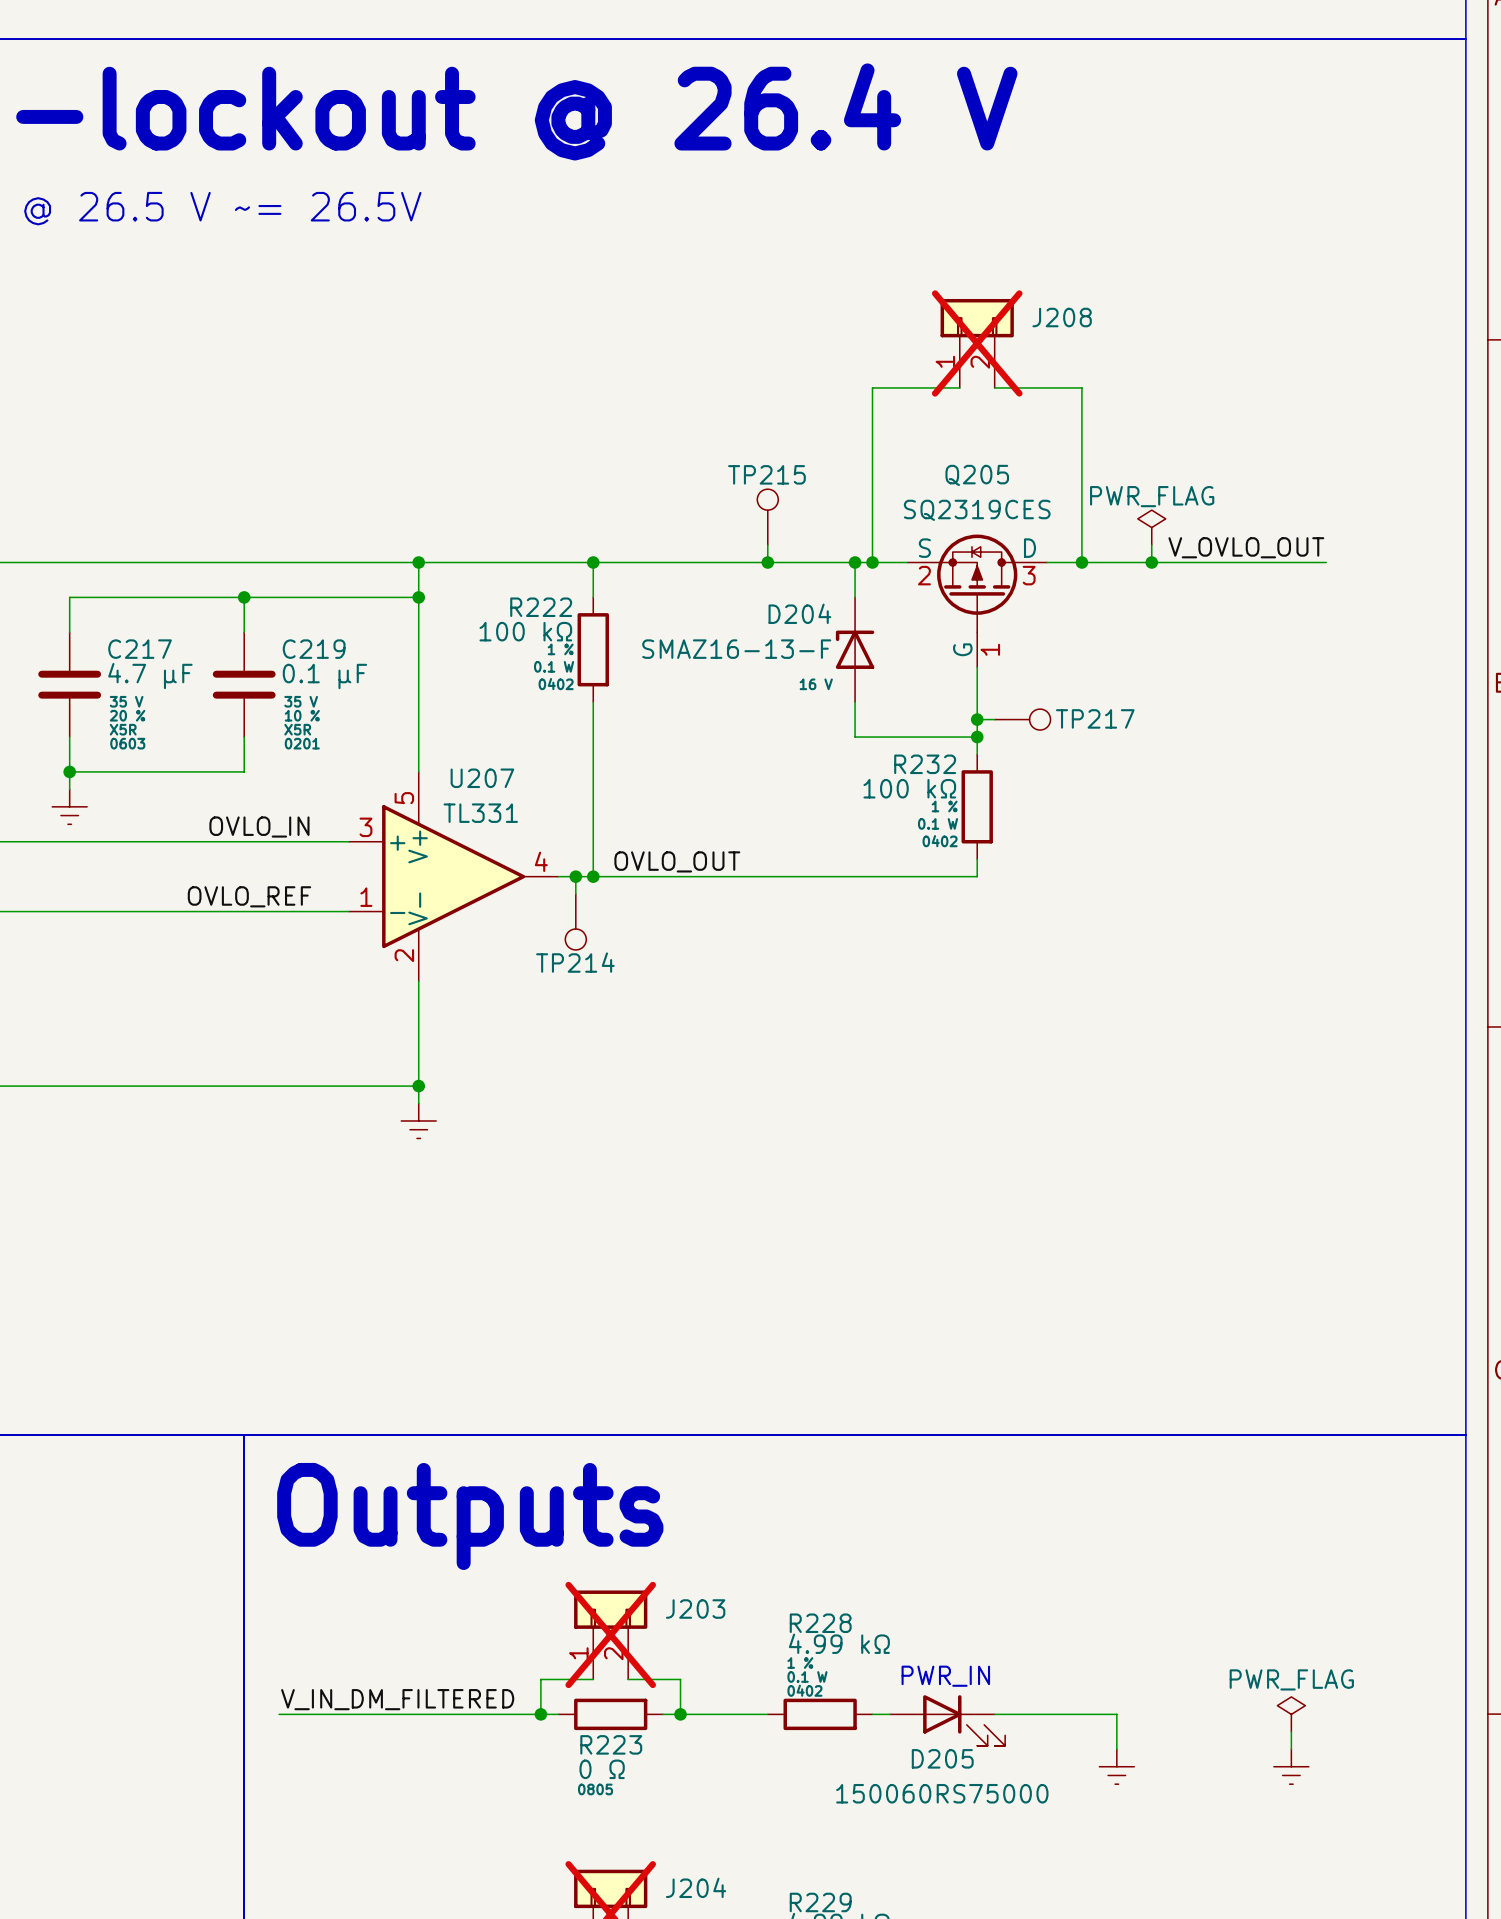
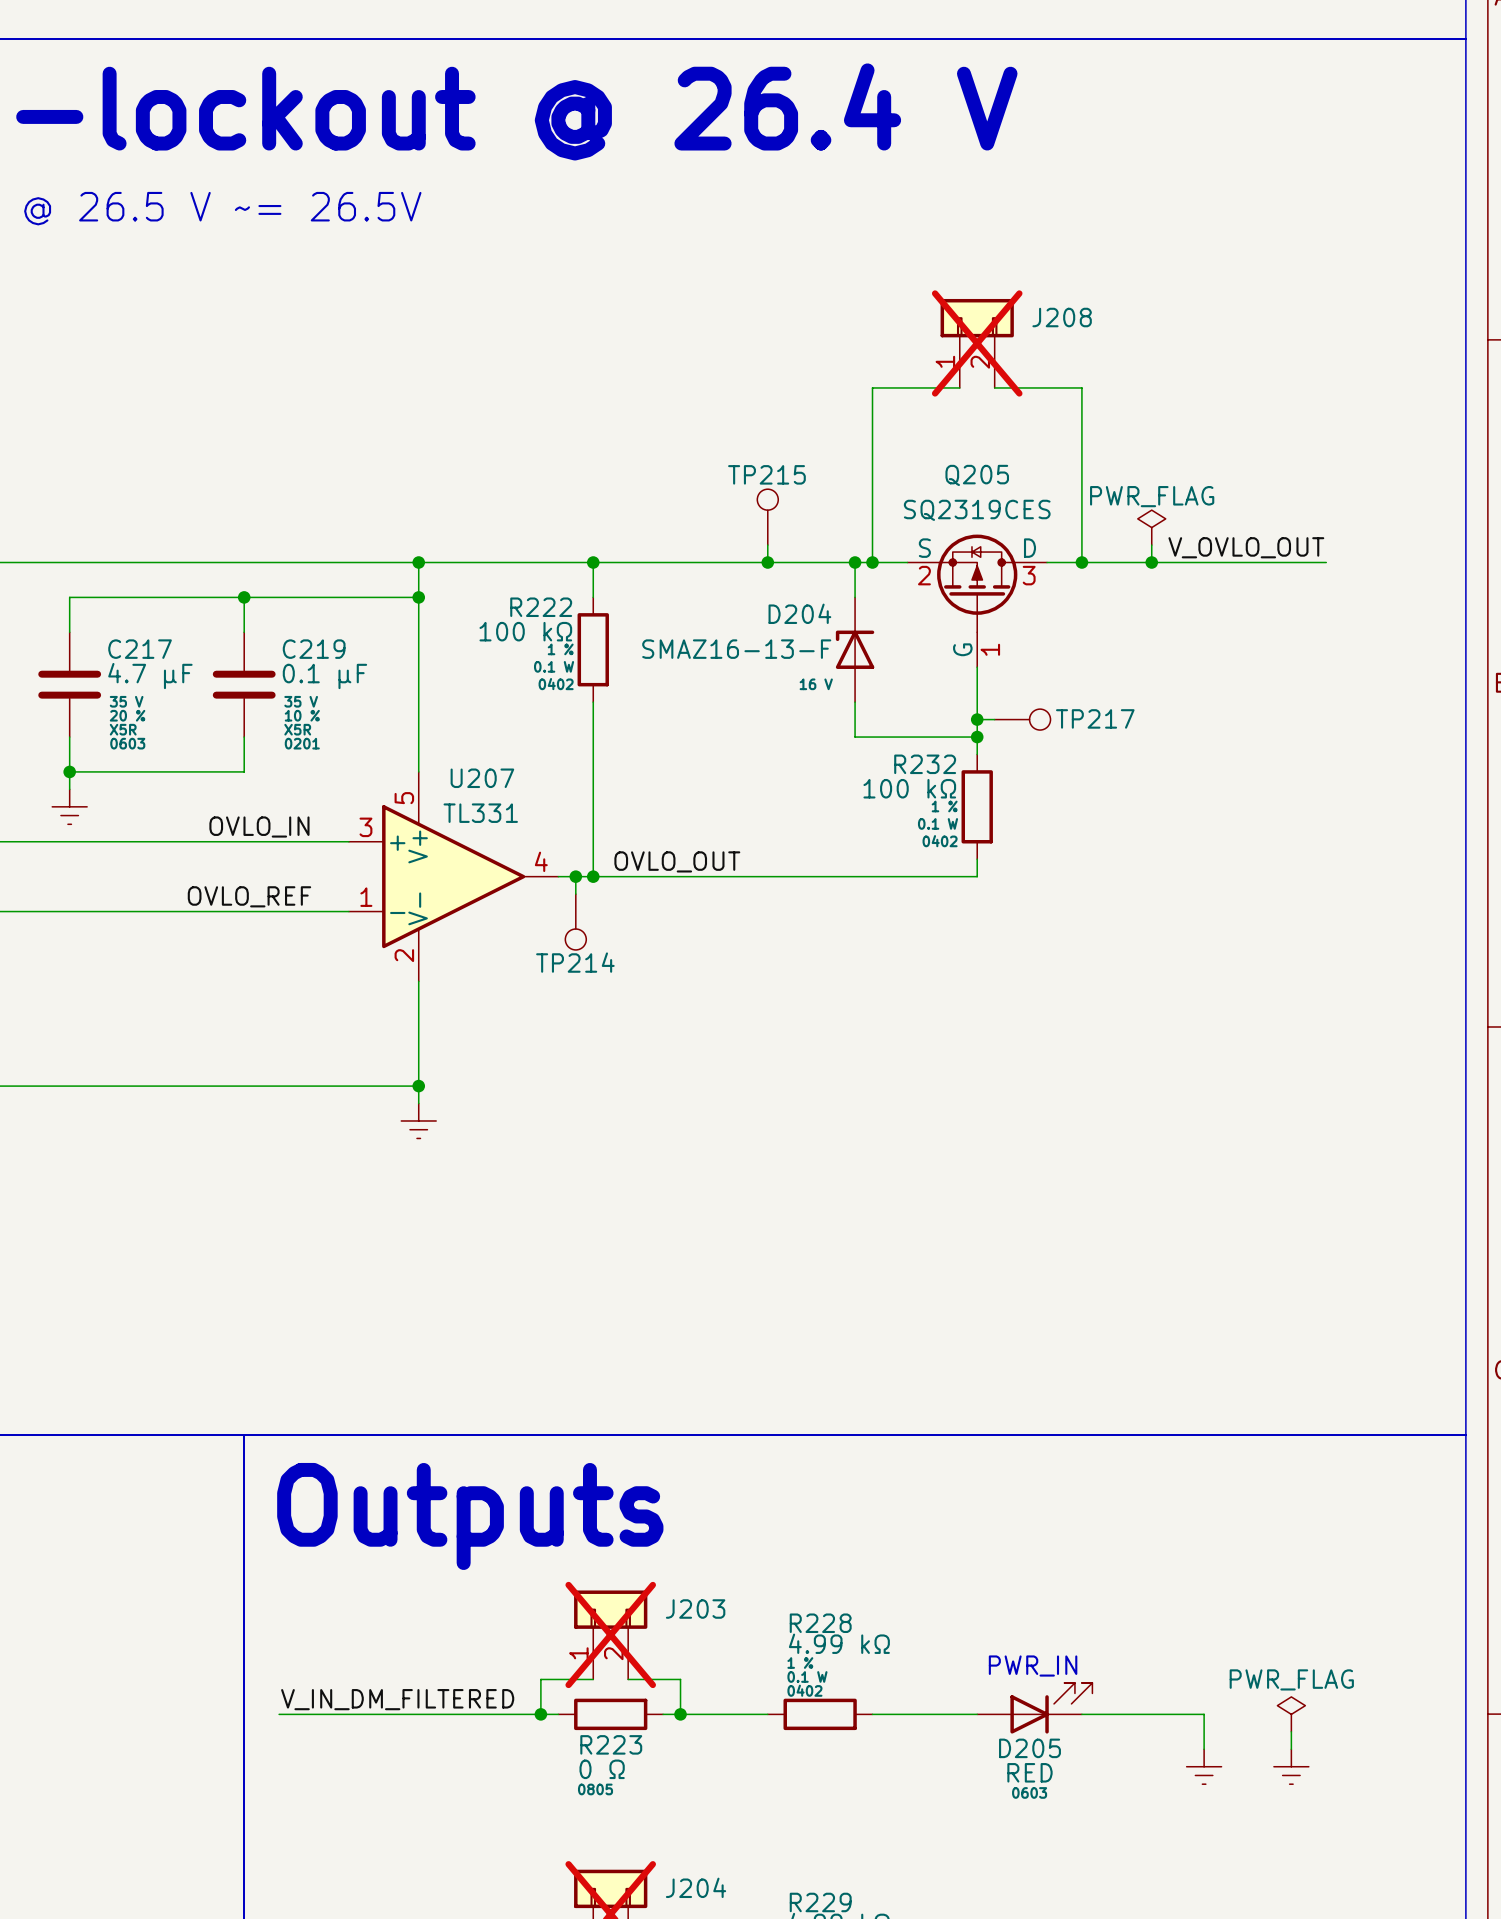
text position: PWR_IN (945, 1676) -> PWR_IN (1033, 1666)
wire: (1116, 1714) (1116, 1749) -> (1116, 1714) (1204, 1714) (1204, 1749)
D205 position: (947, 1720) -> (1034, 1708)
D205 flip: as is (964, 1720) -> up-down (1051, 1708)
power symbol position: (1116, 1766) -> (1204, 1766)
D205 text: none -> 0603 (1029, 1792)
D205 value: 150060RS75000 (942, 1793) -> RED (1029, 1772)

